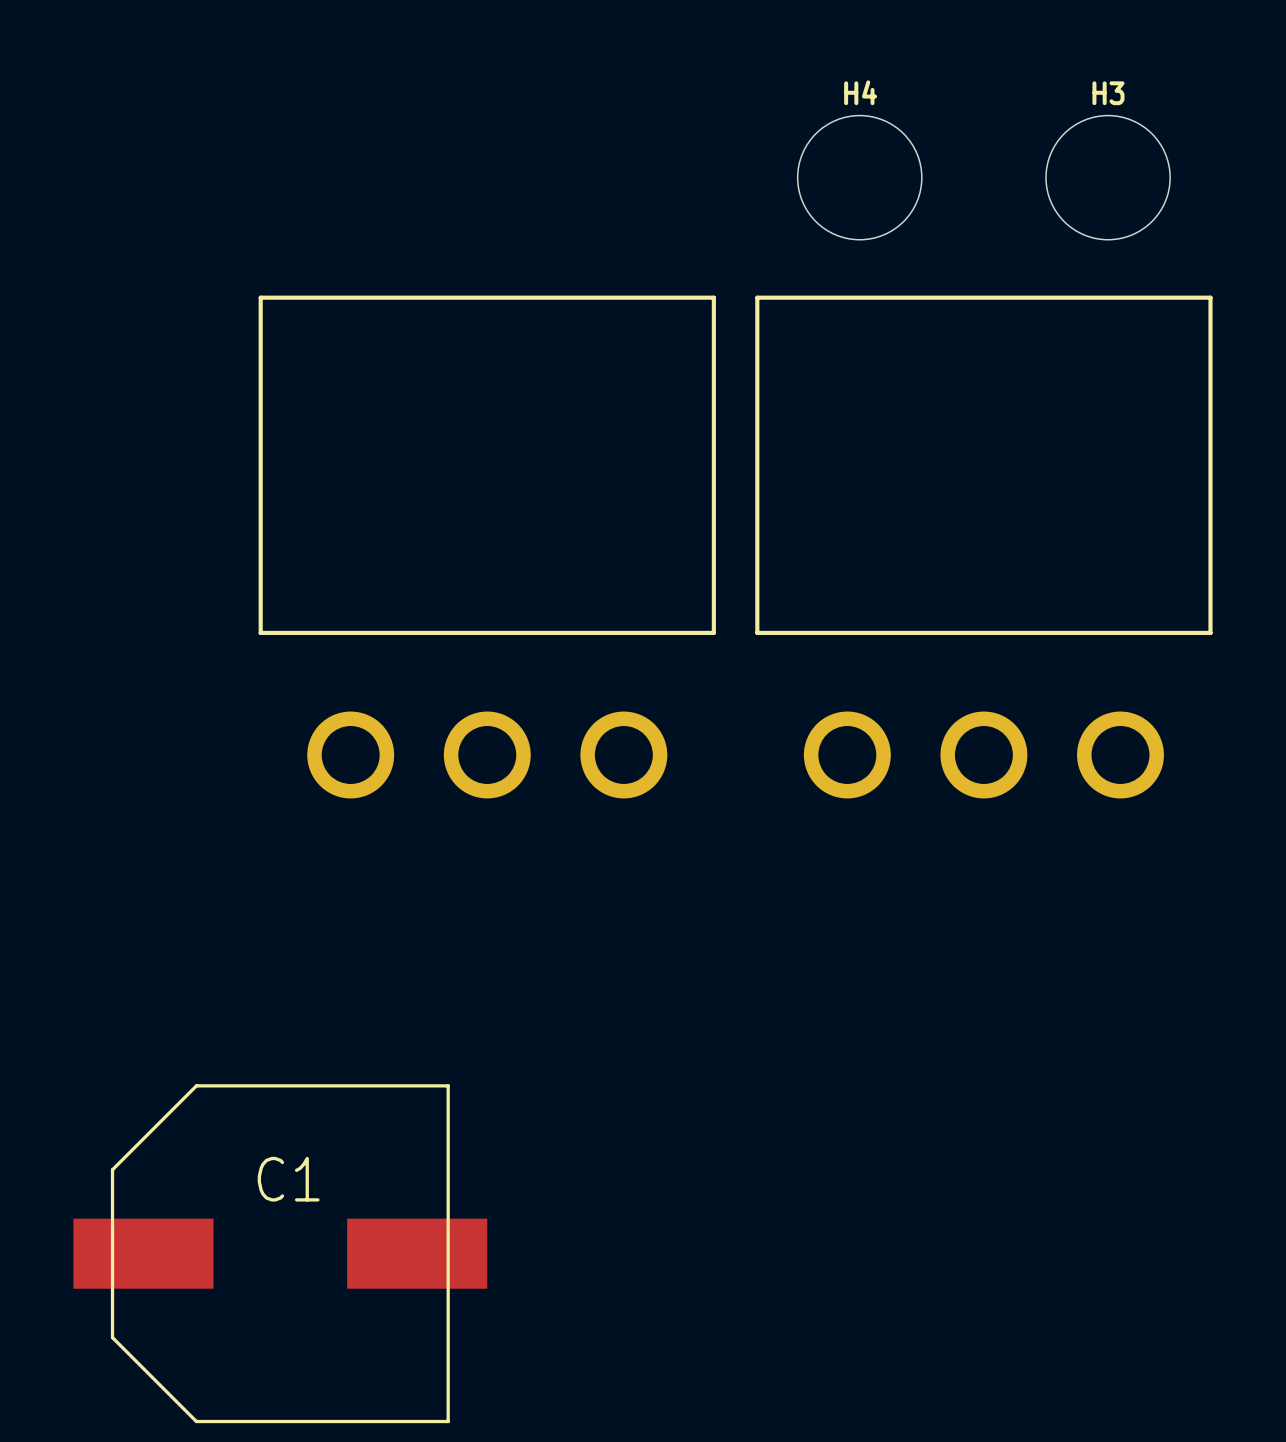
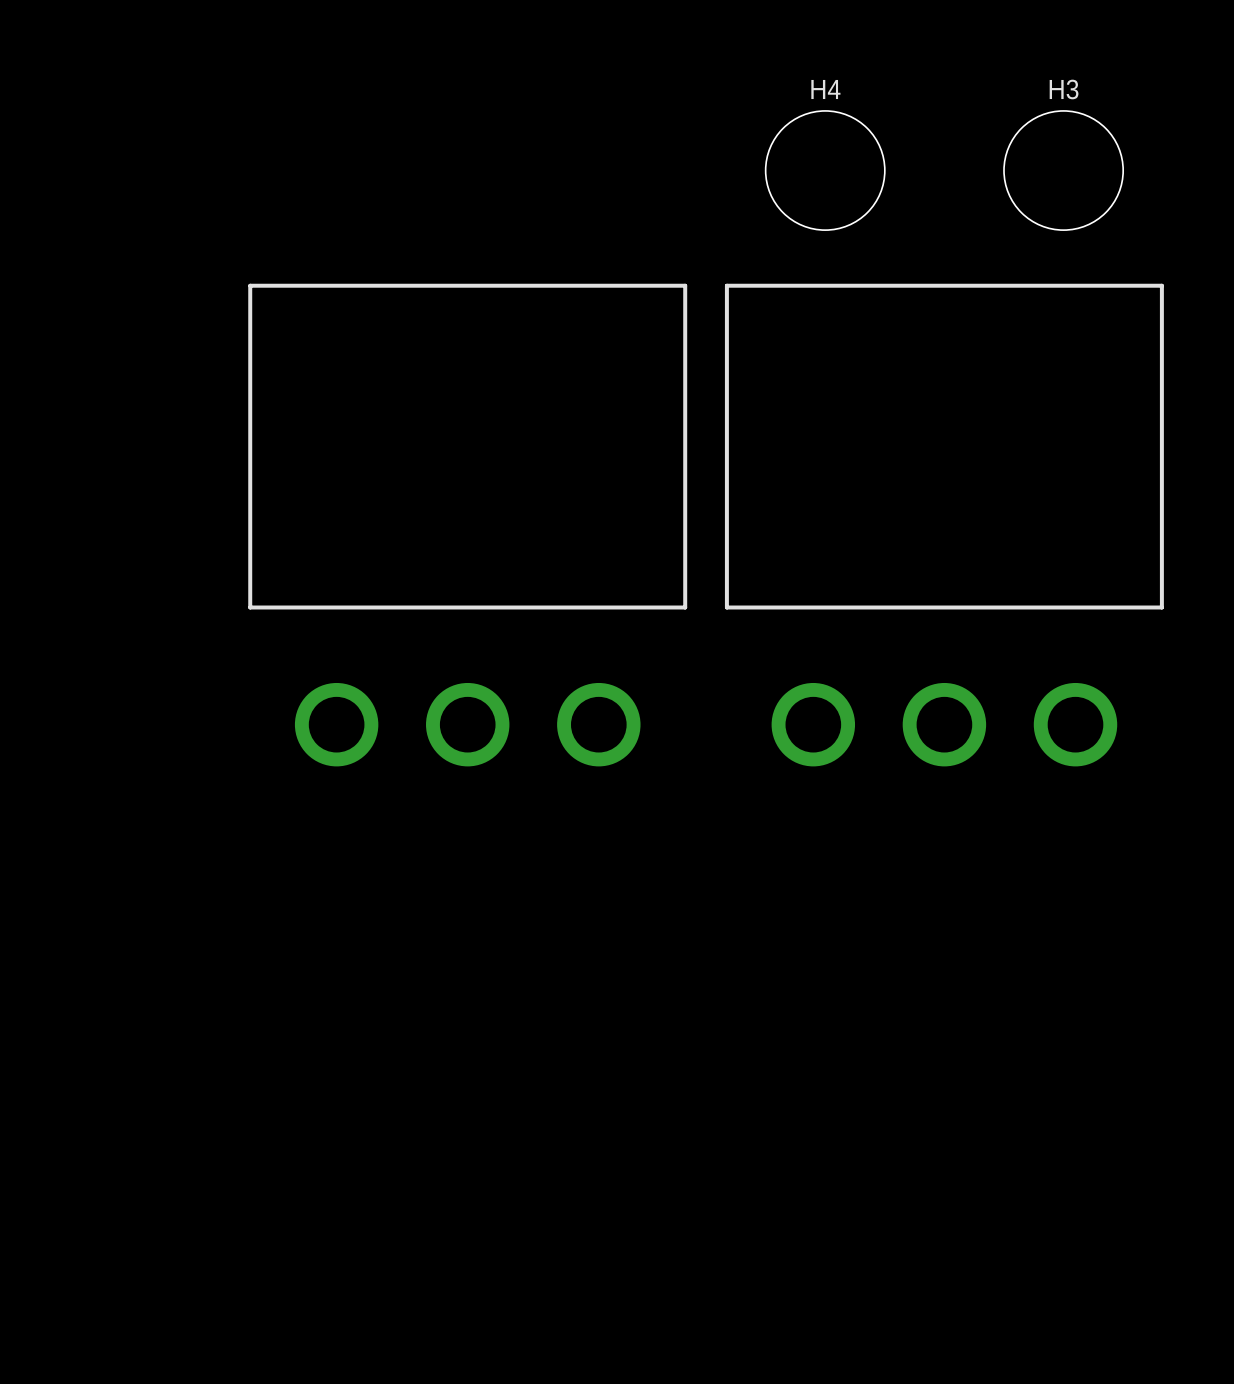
C1: (280, 1253) -> none

